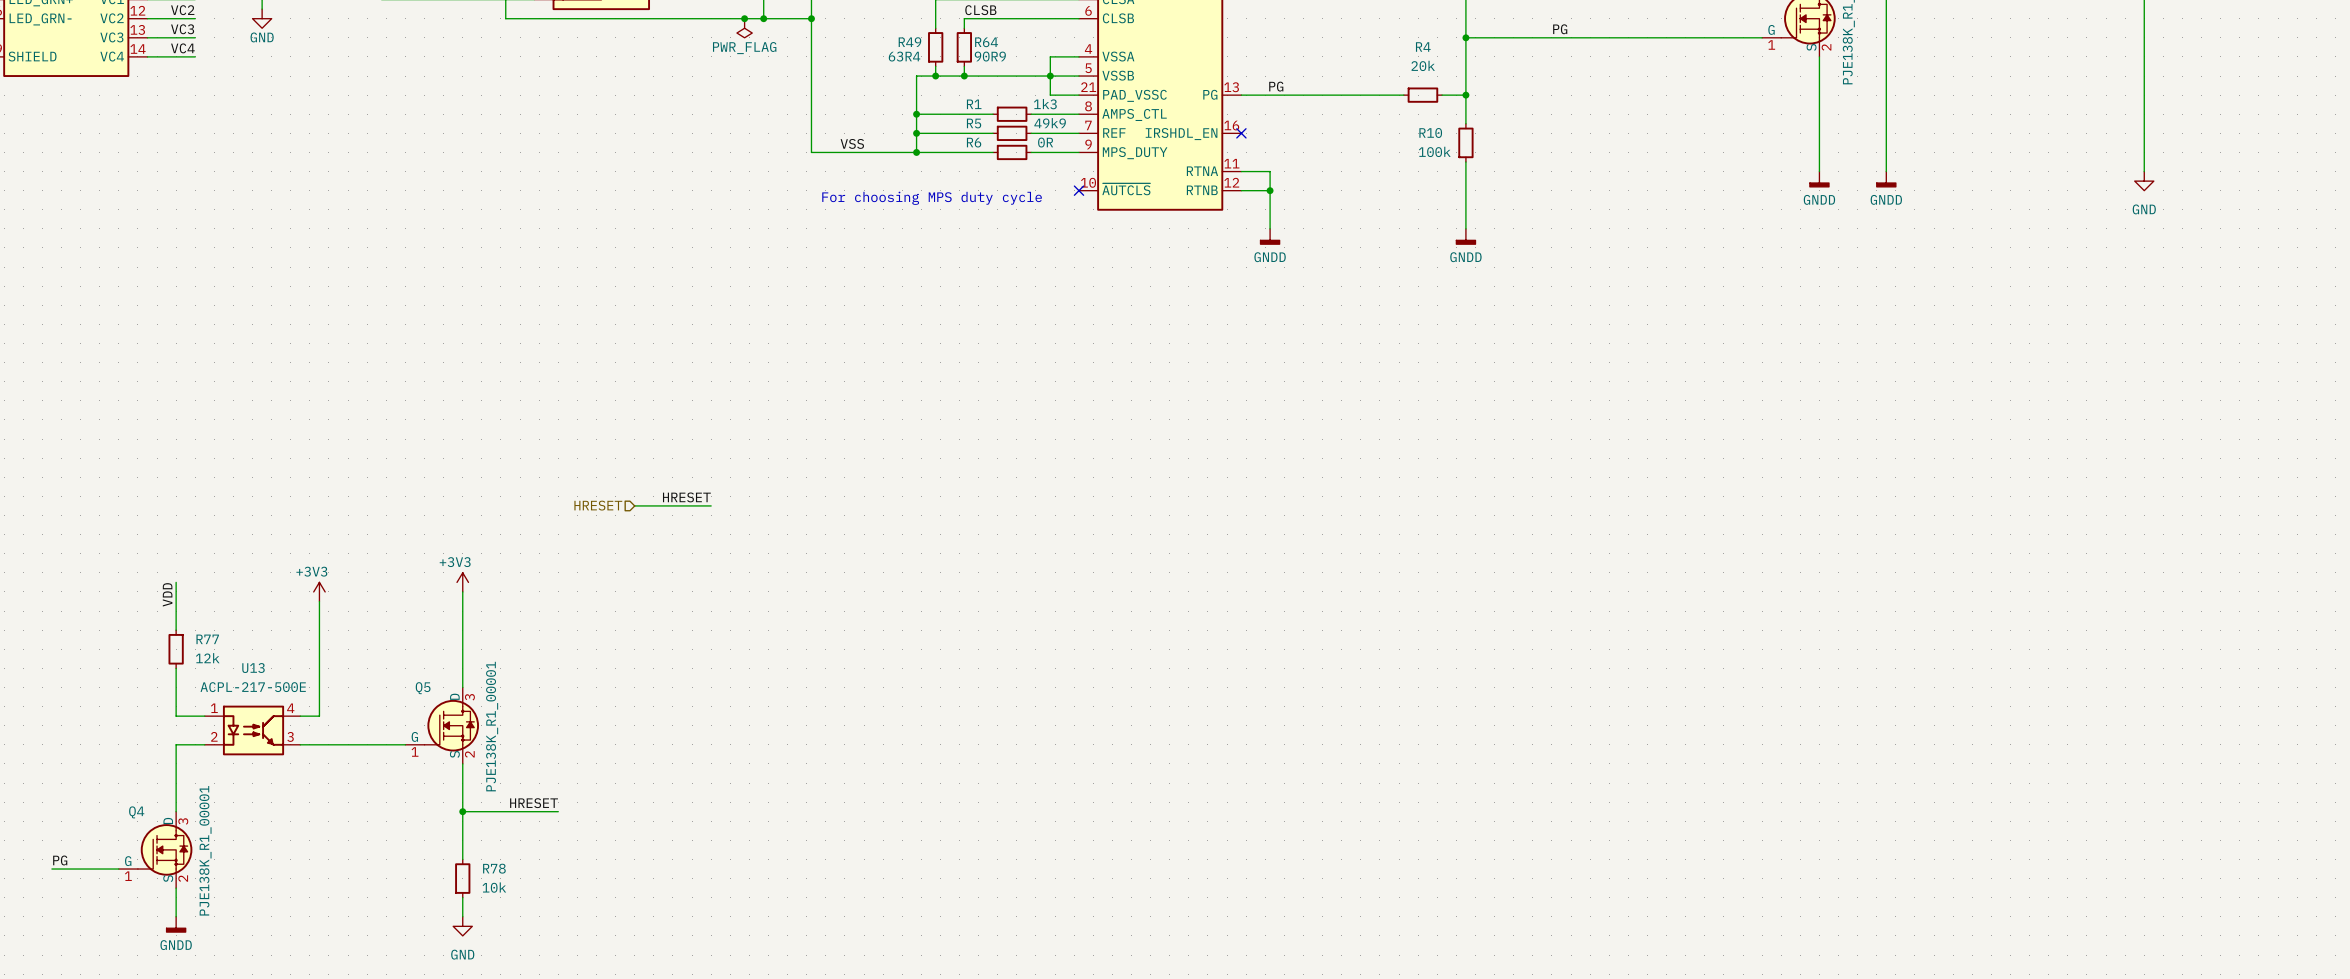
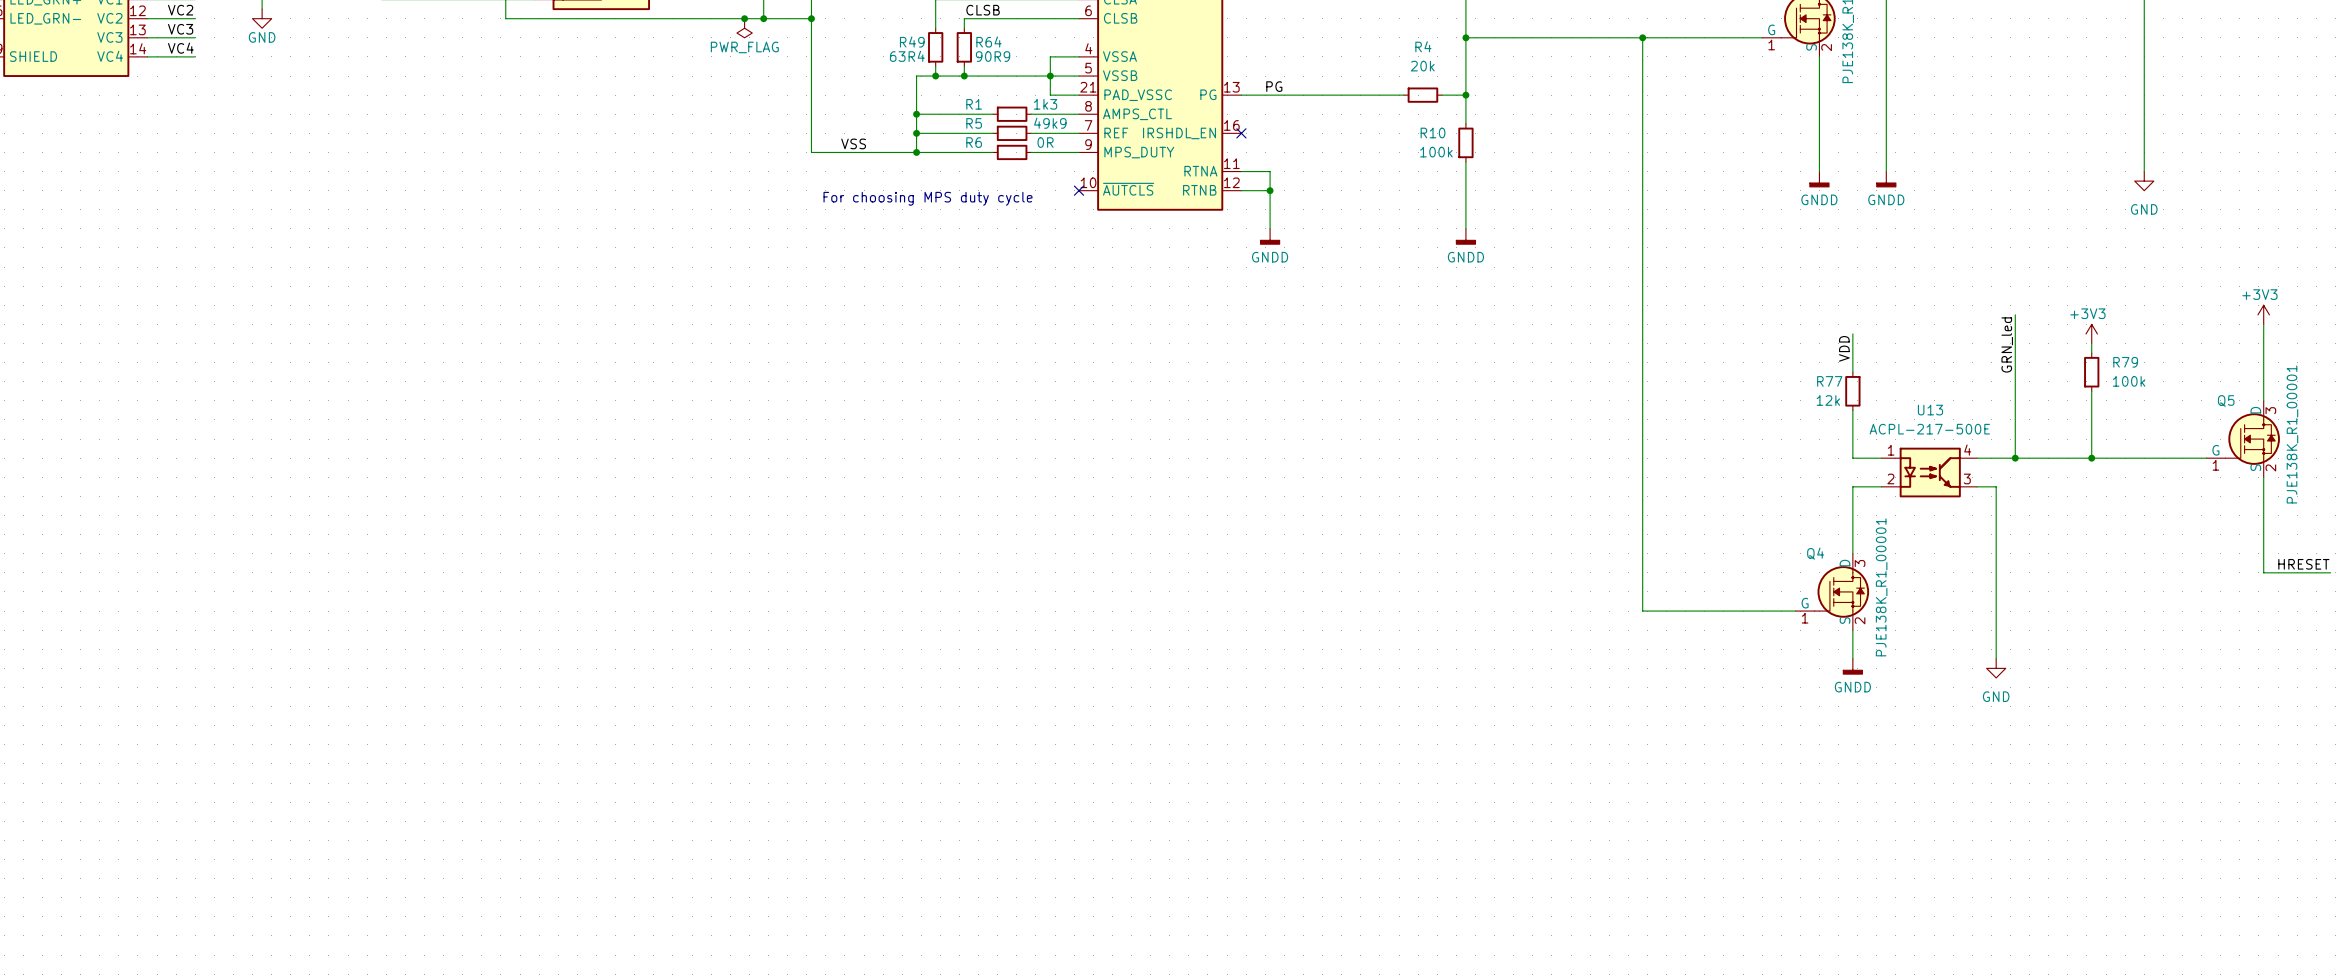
label: PG (1560, 29) -> none
wire: none -> (1642, 37) (1642, 611) (1795, 611)
junction: none -> (1642, 37)
wire: none -> (2015, 314) (2015, 458)
power symbol: none -> +3V3 (2263, 314)
wire: none -> (2263, 324) (2263, 400)
wire: none -> (1852, 333) (1852, 372)
power symbol: none -> +3V3 (2091, 333)
label: none -> GRN_led (2007, 344)
wire: none -> (2091, 343) (2091, 353)
label: none -> VDD (1844, 348)
R79: none -> (2091, 372)
wire: none -> (2091, 391) (2091, 458)
wire: none -> (1852, 410) (1852, 458) (1881, 458)
wire: none -> (1977, 458) (2206, 458)
junction: none -> (2015, 458)
junction: none -> (2091, 458)
wire: none -> (2263, 477) (2263, 572) (2330, 572)
wire: none -> (1881, 486) (1852, 486) (1852, 553)
wire: none -> (1977, 486) (1996, 486) (1996, 658)
label: HRESET (686, 497) -> none
hierarchical label: HRESET (598, 505) -> none
wire: (634, 505) (711, 505) -> none
label: none -> HRESET (2303, 564)
wire: (176, 582) (176, 630) -> none
power symbol: +3V3 (462, 582) -> none
power symbol: +3V3 (319, 591) -> none
wire: (462, 591) (462, 687) -> none
label: VDD (167, 594) -> none
wire: (319, 601) (319, 716) (300, 716) -> none
wire: none -> (1852, 630) (1852, 658)
R77 name position: R77 (207, 639) -> R77 (1829, 381)
R77 position: (176, 649) -> (1852, 391)
R77 text position: 12k (207, 658) -> 12k (1828, 400)
power symbol: none -> GNDD (1852, 666)
wire: (176, 668) (176, 716) (204, 716) -> none
power symbol: none -> GND (1996, 668)
Q5 position: (442, 725) -> (2243, 439)
U13 position: (252, 730) -> (1929, 472)
wire: (204, 744) (176, 744) (176, 811) -> none
wire: (300, 744) (405, 744) -> none
wire: (462, 763) (462, 859) -> none
label: HRESET (534, 803) -> none
wire: (462, 811) (558, 811) -> none
junction: (462, 811) -> none
Q4 position: (155, 849) -> (1832, 591)
label: PG (60, 860) -> none
wire: (51, 869) (118, 869) -> none
R78: (462, 878) -> none
wire: (176, 888) (176, 916) -> none
wire: (462, 897) (462, 916) -> none
power symbol: GNDD (176, 924) -> none
power symbol: GND (462, 926) -> none

